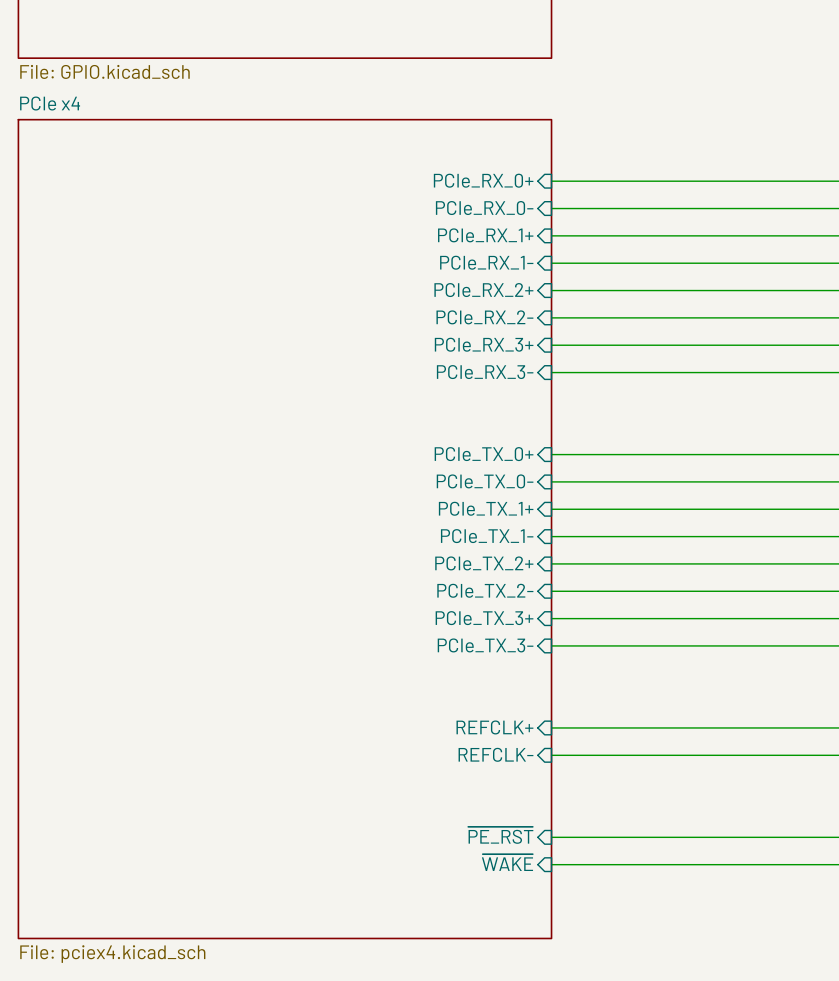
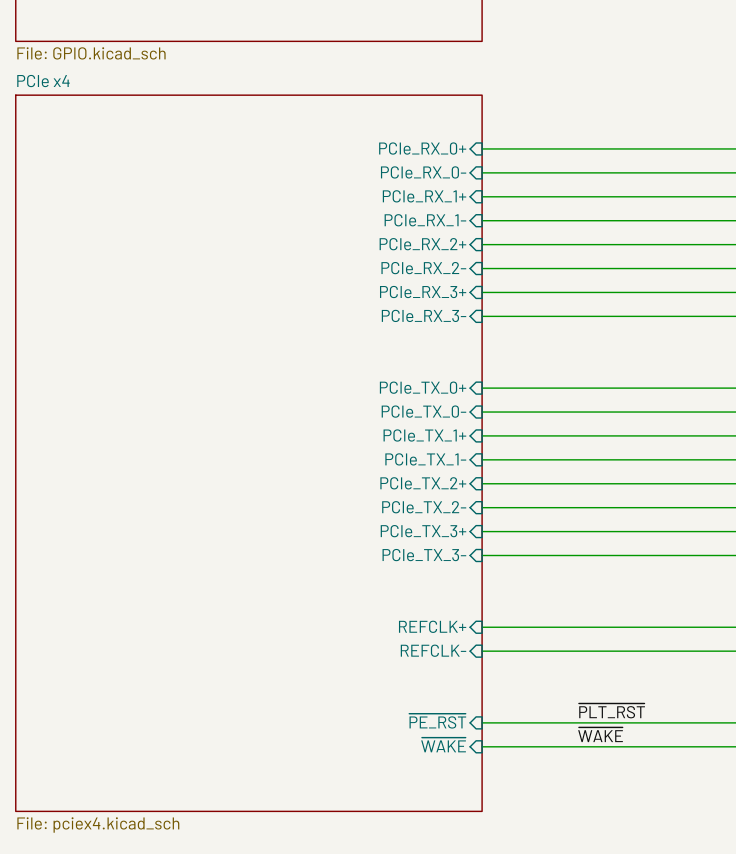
label: none -> ~{PLT_RST} (611, 710)
label: none -> ~{WAKE} (600, 734)

